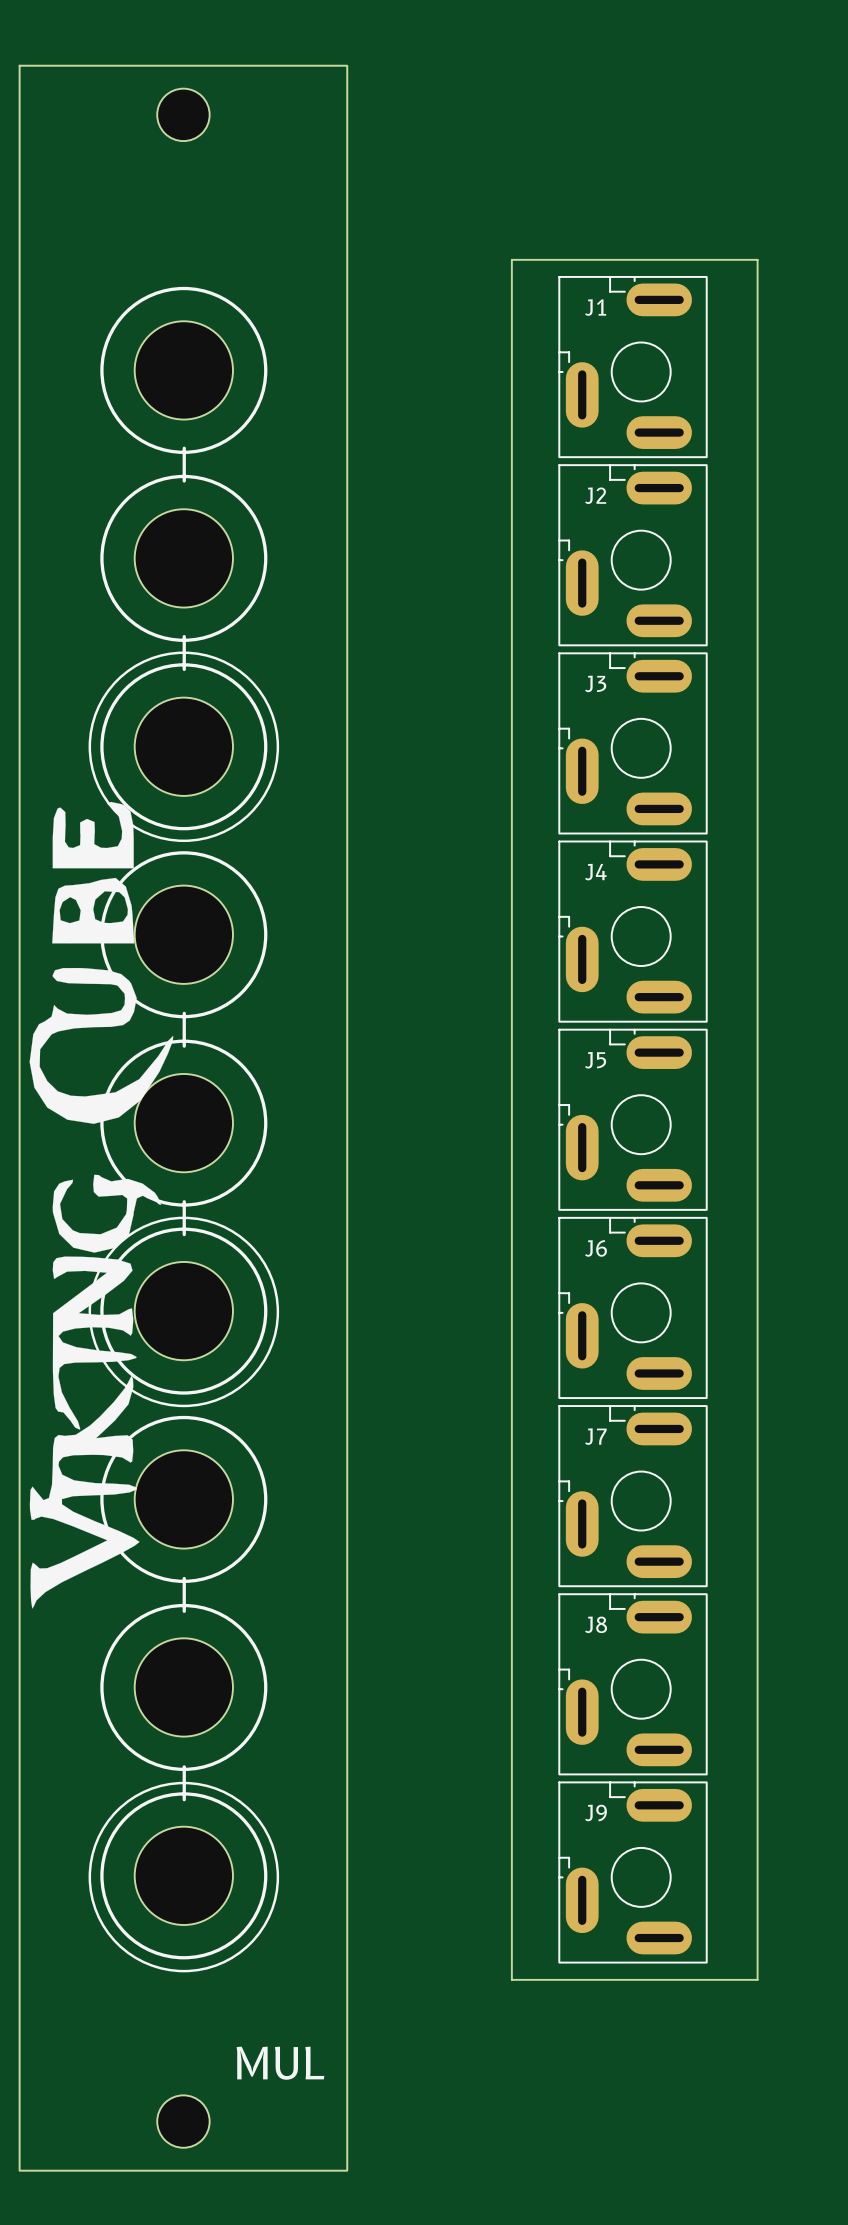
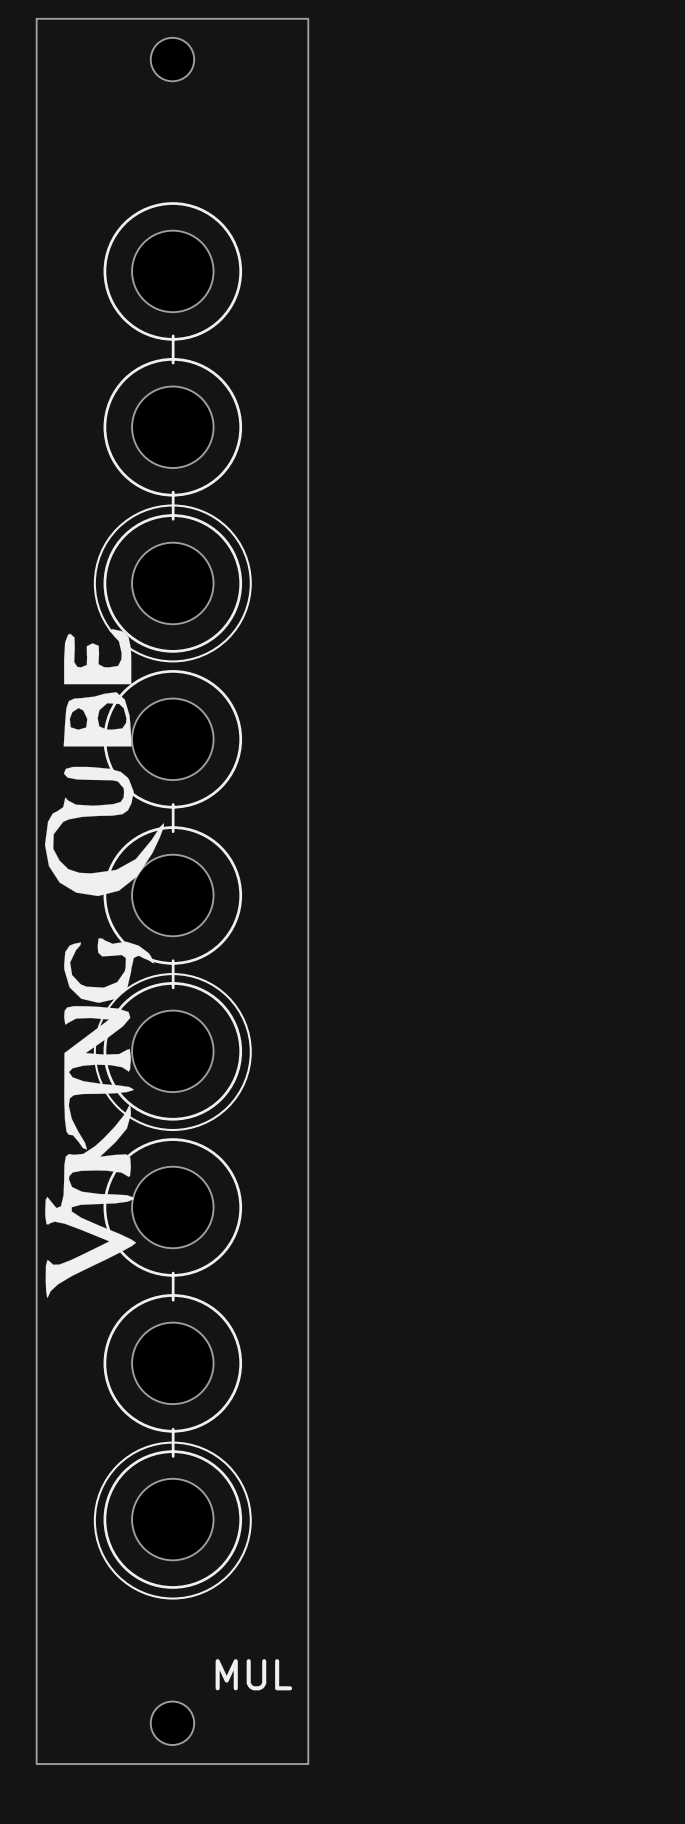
board edge: (511, 259) (511, 1979) (757, 1979) (757, 259) (511, 259) -> none
J1: (633, 367) -> none
J2: (633, 555) -> none
J3: (633, 743) -> none
J4: (633, 931) -> none
J5: (633, 1119) -> none
J6: (633, 1307) -> none
J7: (633, 1496) -> none
J8: (633, 1684) -> none
J9: (633, 1872) -> none

